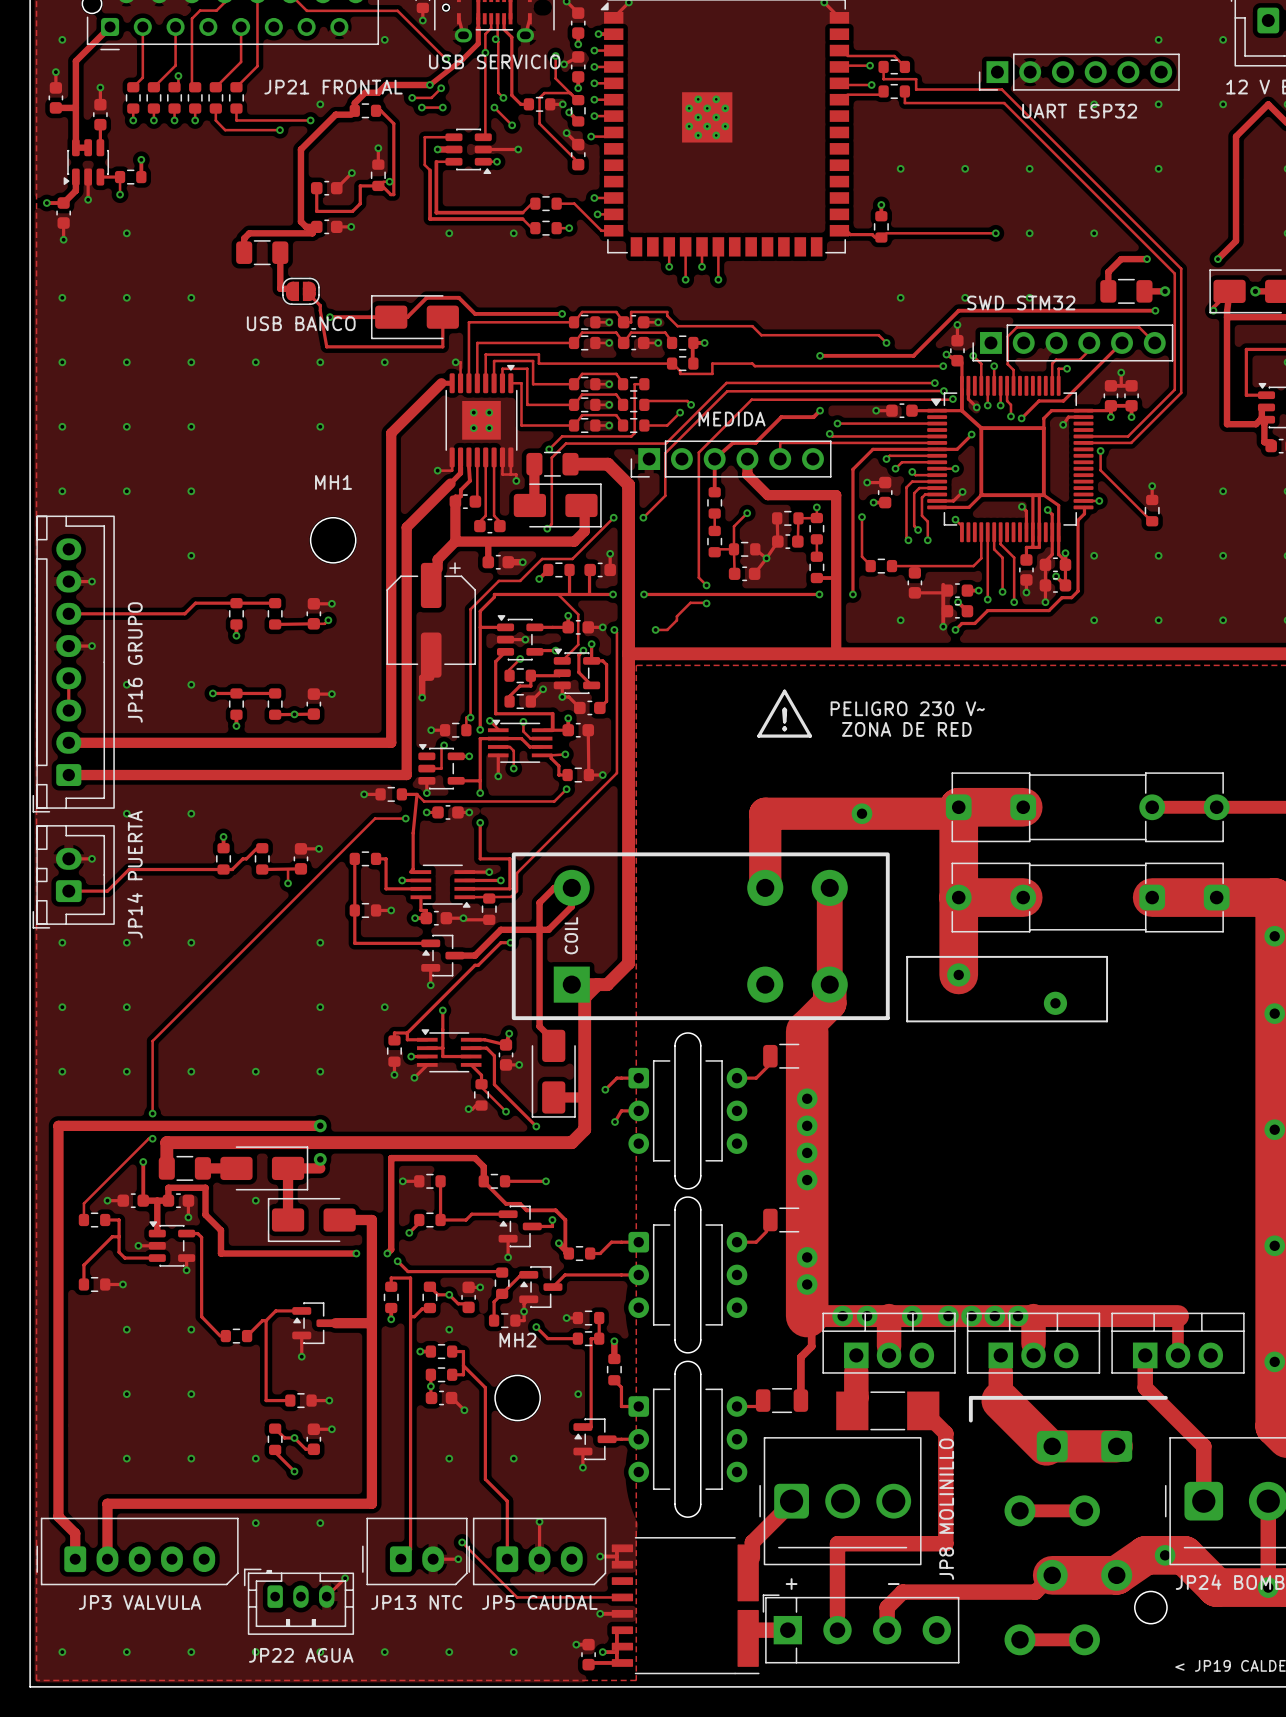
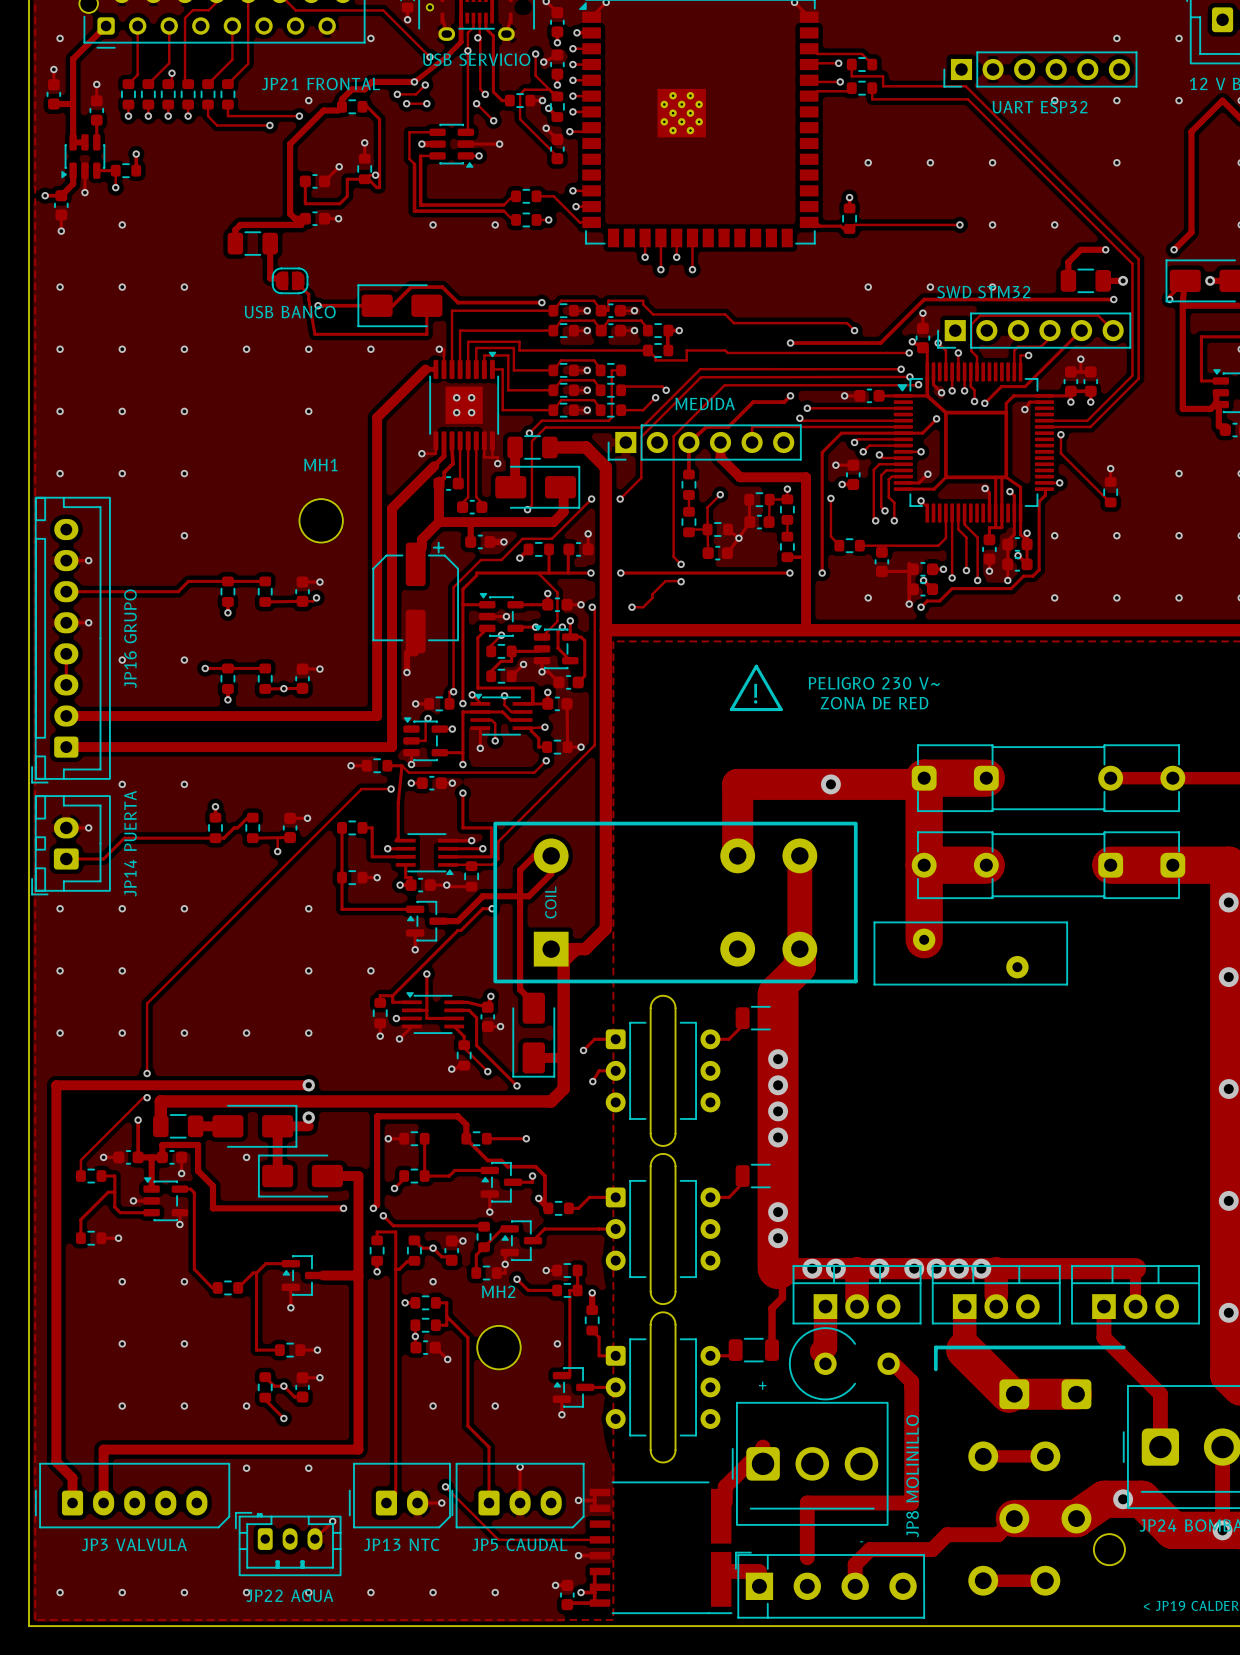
part footprint: [836, 1391, 940, 1431] -> [789, 1327, 900, 1401]
part position: (840, 1501) -> (810, 1463)
text position: JP8 MOLINILLO (946, 1509) -> JP8 MOLINILLO (912, 1476)
track: (945, 1543) (837, 1543) (837, 1559) -> (911, 1488) (911, 1503) (807, 1503)
text position: + (791, 1584) -> + (762, 1385)
text position: - (893, 1584) -> - (861, 1541)
track: (982, 1592) (902, 1592) (887, 1607) (887, 1623) -> (947, 1534) (932, 1549) (870, 1549) (855, 1564)
part position: (861, 1628) -> (830, 1585)

